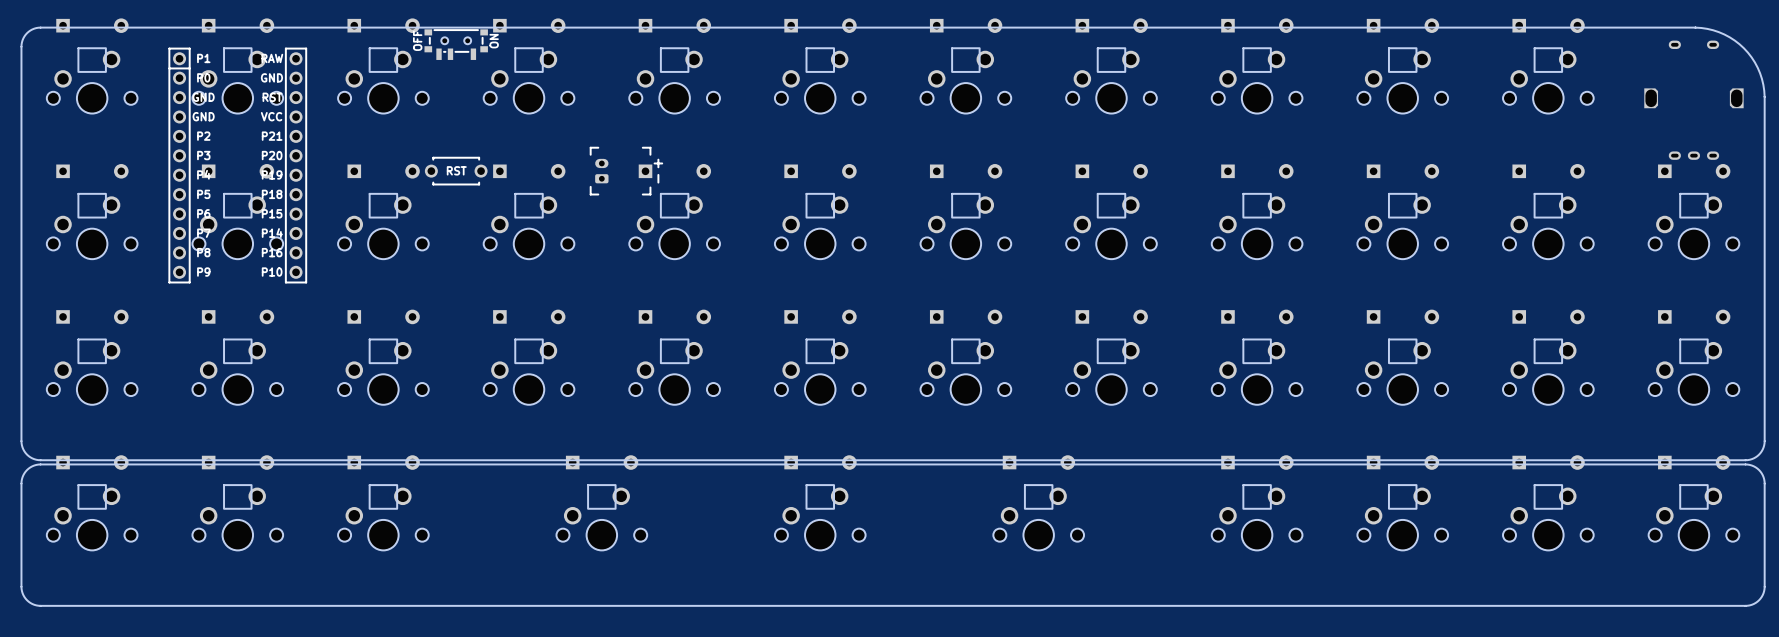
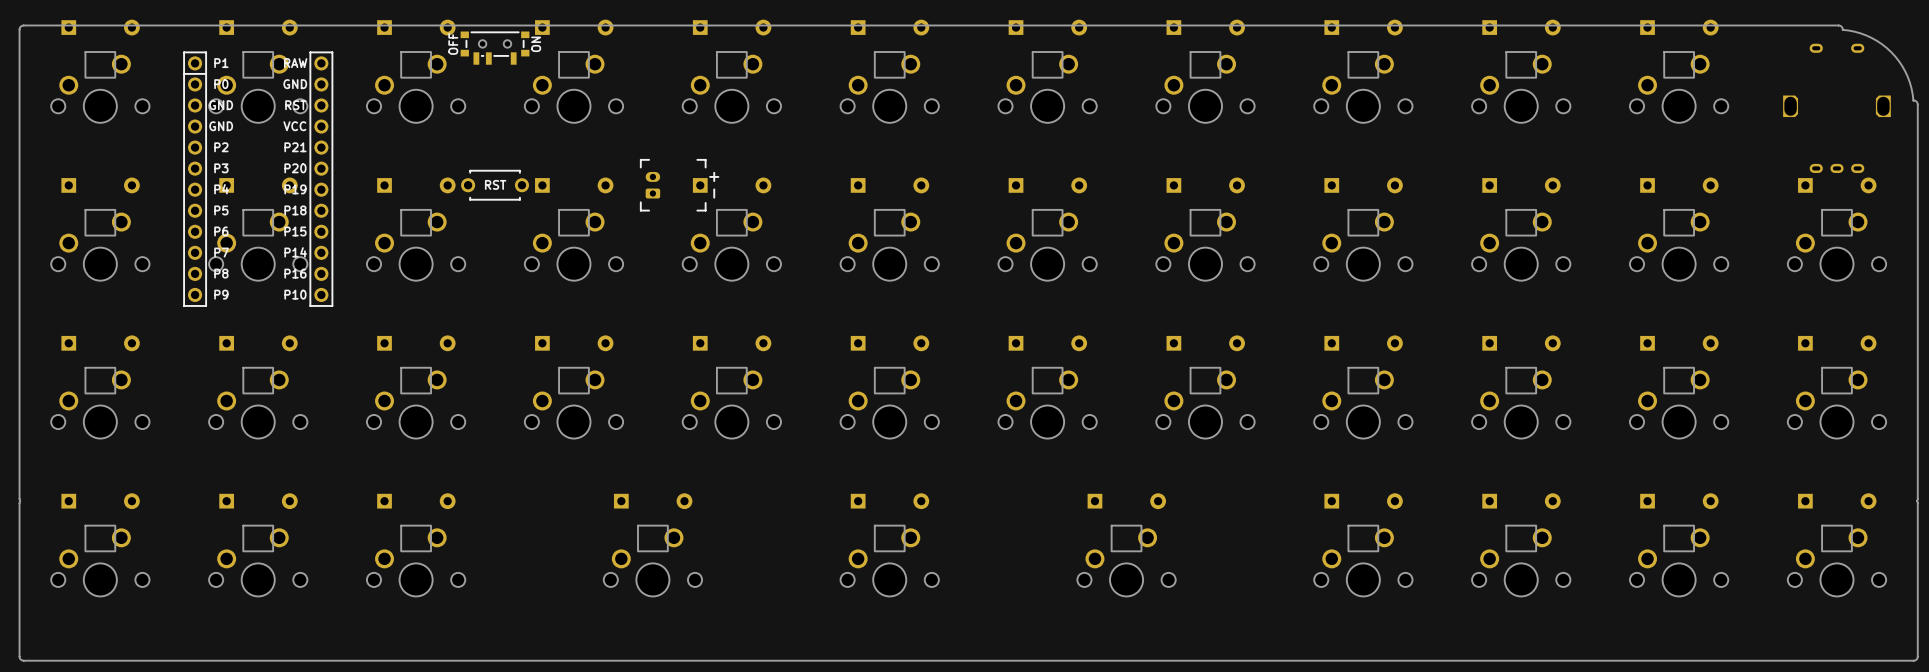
board edge: (40, 27) (1695, 27) (1713, 30) (1734, 40) (1748, 52) (1760, 73) (1764, 90) (1764, 445) (1757, 456) (1745, 460) (36, 459) (25, 453) (21, 441) (21, 46) (27, 33) (40, 27) -> none
board edge: none -> (20, 500) (19, 656) (23, 660) (1914, 660) (1917, 656) (1917, 500)
board edge: none -> (20, 500) (19, 29) (23, 25) (1839, 25) (1842, 29) (1871, 37) (1891, 52) (1905, 71) (1913, 100) (1917, 104) (1917, 500)
board edge: (40, 464) (1747, 464) (1759, 470) (1764, 481) (1764, 588) (1757, 601) (1745, 605) (38, 605) (27, 600) (21, 588) (21, 483) (27, 470) (40, 464) -> none

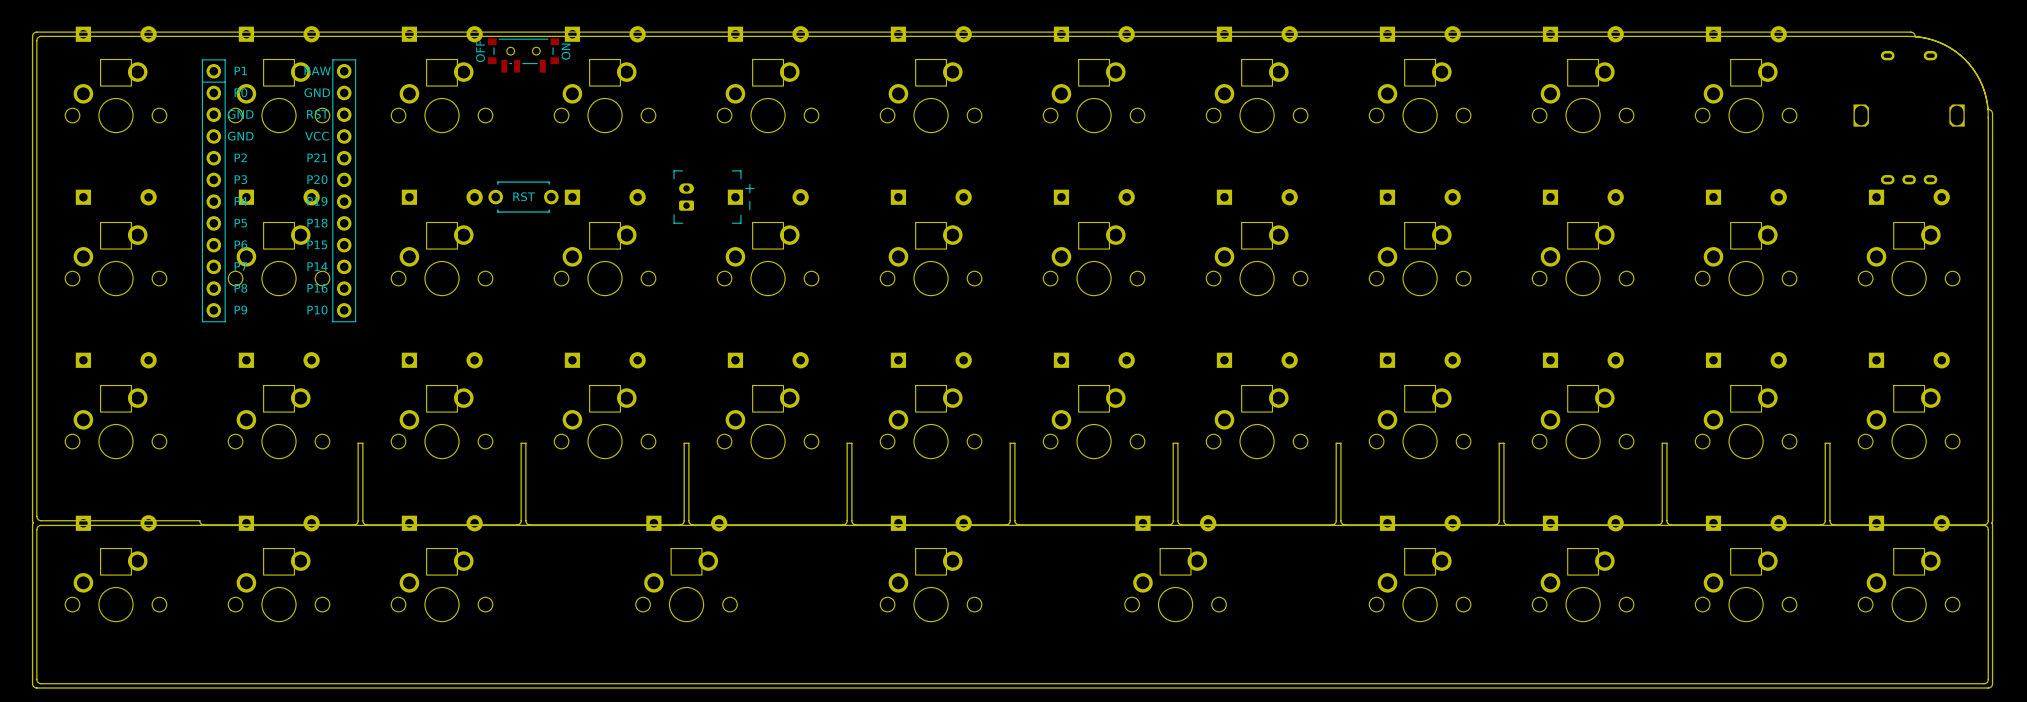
board edge: none -> (41, 36) (1906, 36) (1926, 38) (1949, 47) (1969, 64) (1980, 80) (1987, 104) (1988, 521) (1983, 525) (1832, 524) (1829, 520) (1829, 443) (1825, 443) (1825, 520) (1820, 525) (1669, 524) (1666, 520) (1666, 443) (1662, 443) (1662, 520) (1657, 525) (1506, 524) (1503, 520) (1503, 443) (1499, 443) (1499, 520) (1494, 525) (1343, 524) (1340, 520) (1340, 443) (1336, 443) (1336, 520) (1332, 524) (1180, 524) (1177, 520) (1177, 443) (1173, 443) (1173, 520) (1169, 524) (1017, 524) (1014, 520) (1014, 443) (1010, 443) (1010, 520) (1006, 524) (854, 524) (851, 520) (851, 443) (847, 443) (847, 520) (843, 524) (691, 524) (688, 520) (688, 443) (684, 443) (684, 520) (680, 524) (528, 524) (525, 520) (525, 443) (521, 443) (521, 520) (517, 524) (365, 524) (362, 520) (362, 443) (358, 443) (358, 520) (354, 524) (204, 525) (199, 520) (40, 520) (36, 516) (36, 40) (41, 36)
board edge: none -> (41, 525) (1984, 525) (1988, 529) (1988, 679) (1983, 683) (40, 683) (36, 679) (36, 529) (41, 525)

